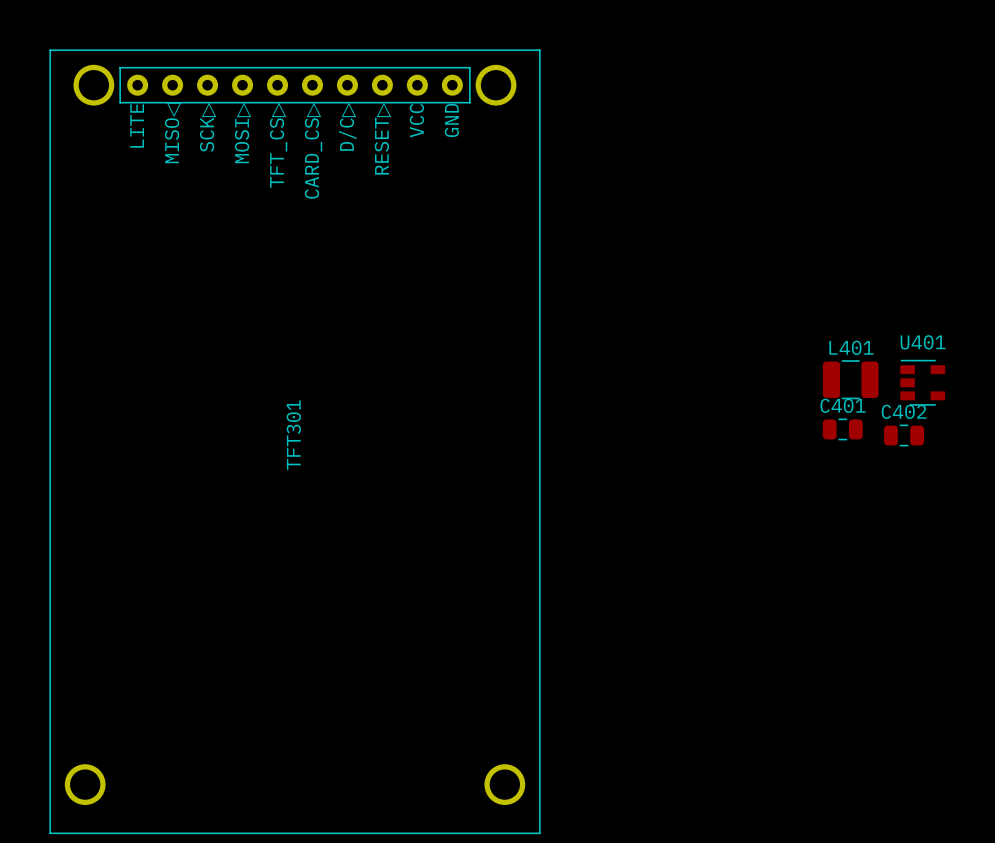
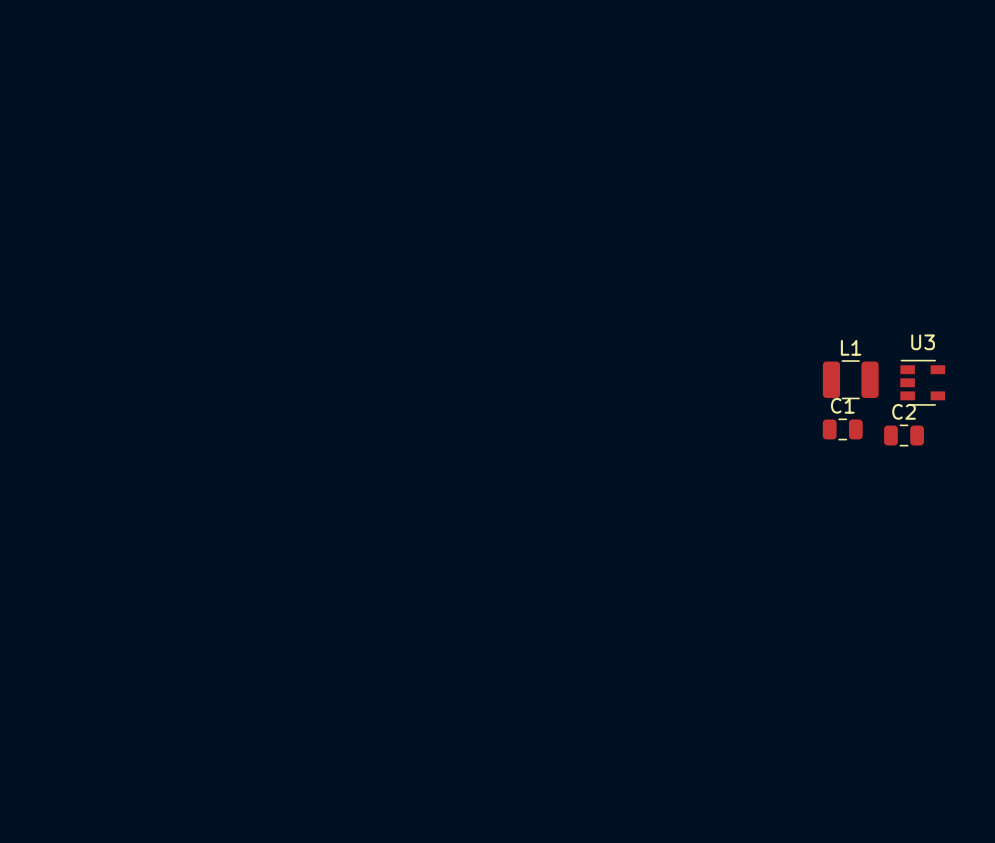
U401 name: U401 (923, 342) -> U3 (923, 342)
L401 name: L401 (851, 347) -> L1 (851, 347)
C401 name: C401 (842, 405) -> C1 (842, 405)
C402 name: C402 (904, 411) -> C2 (904, 411)
TFT301: (295, 441) -> none

